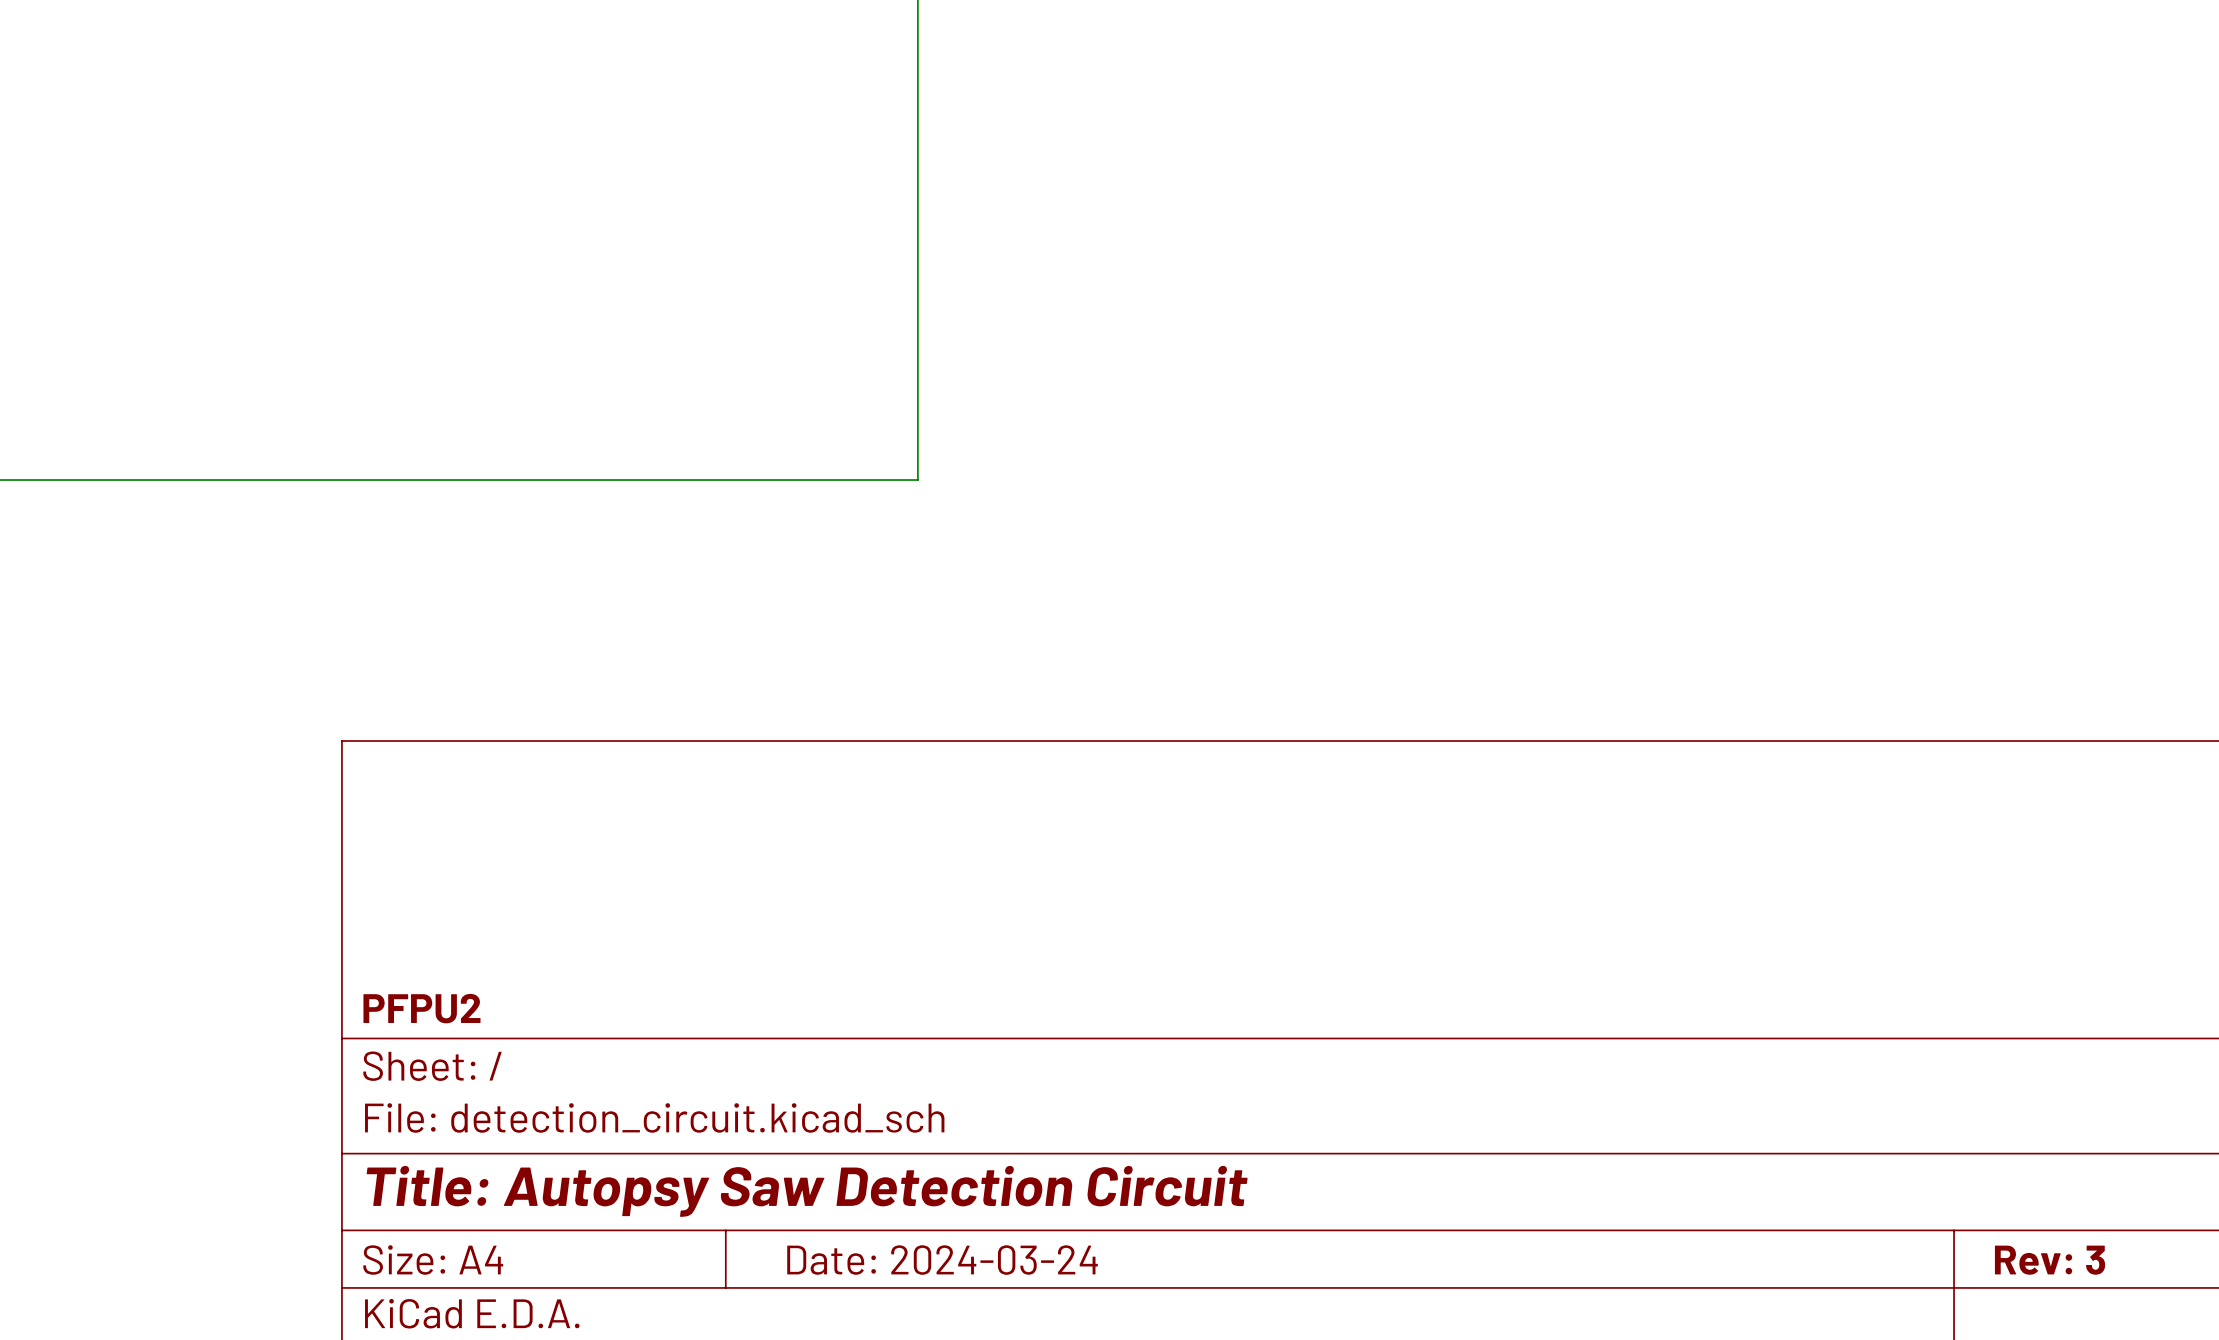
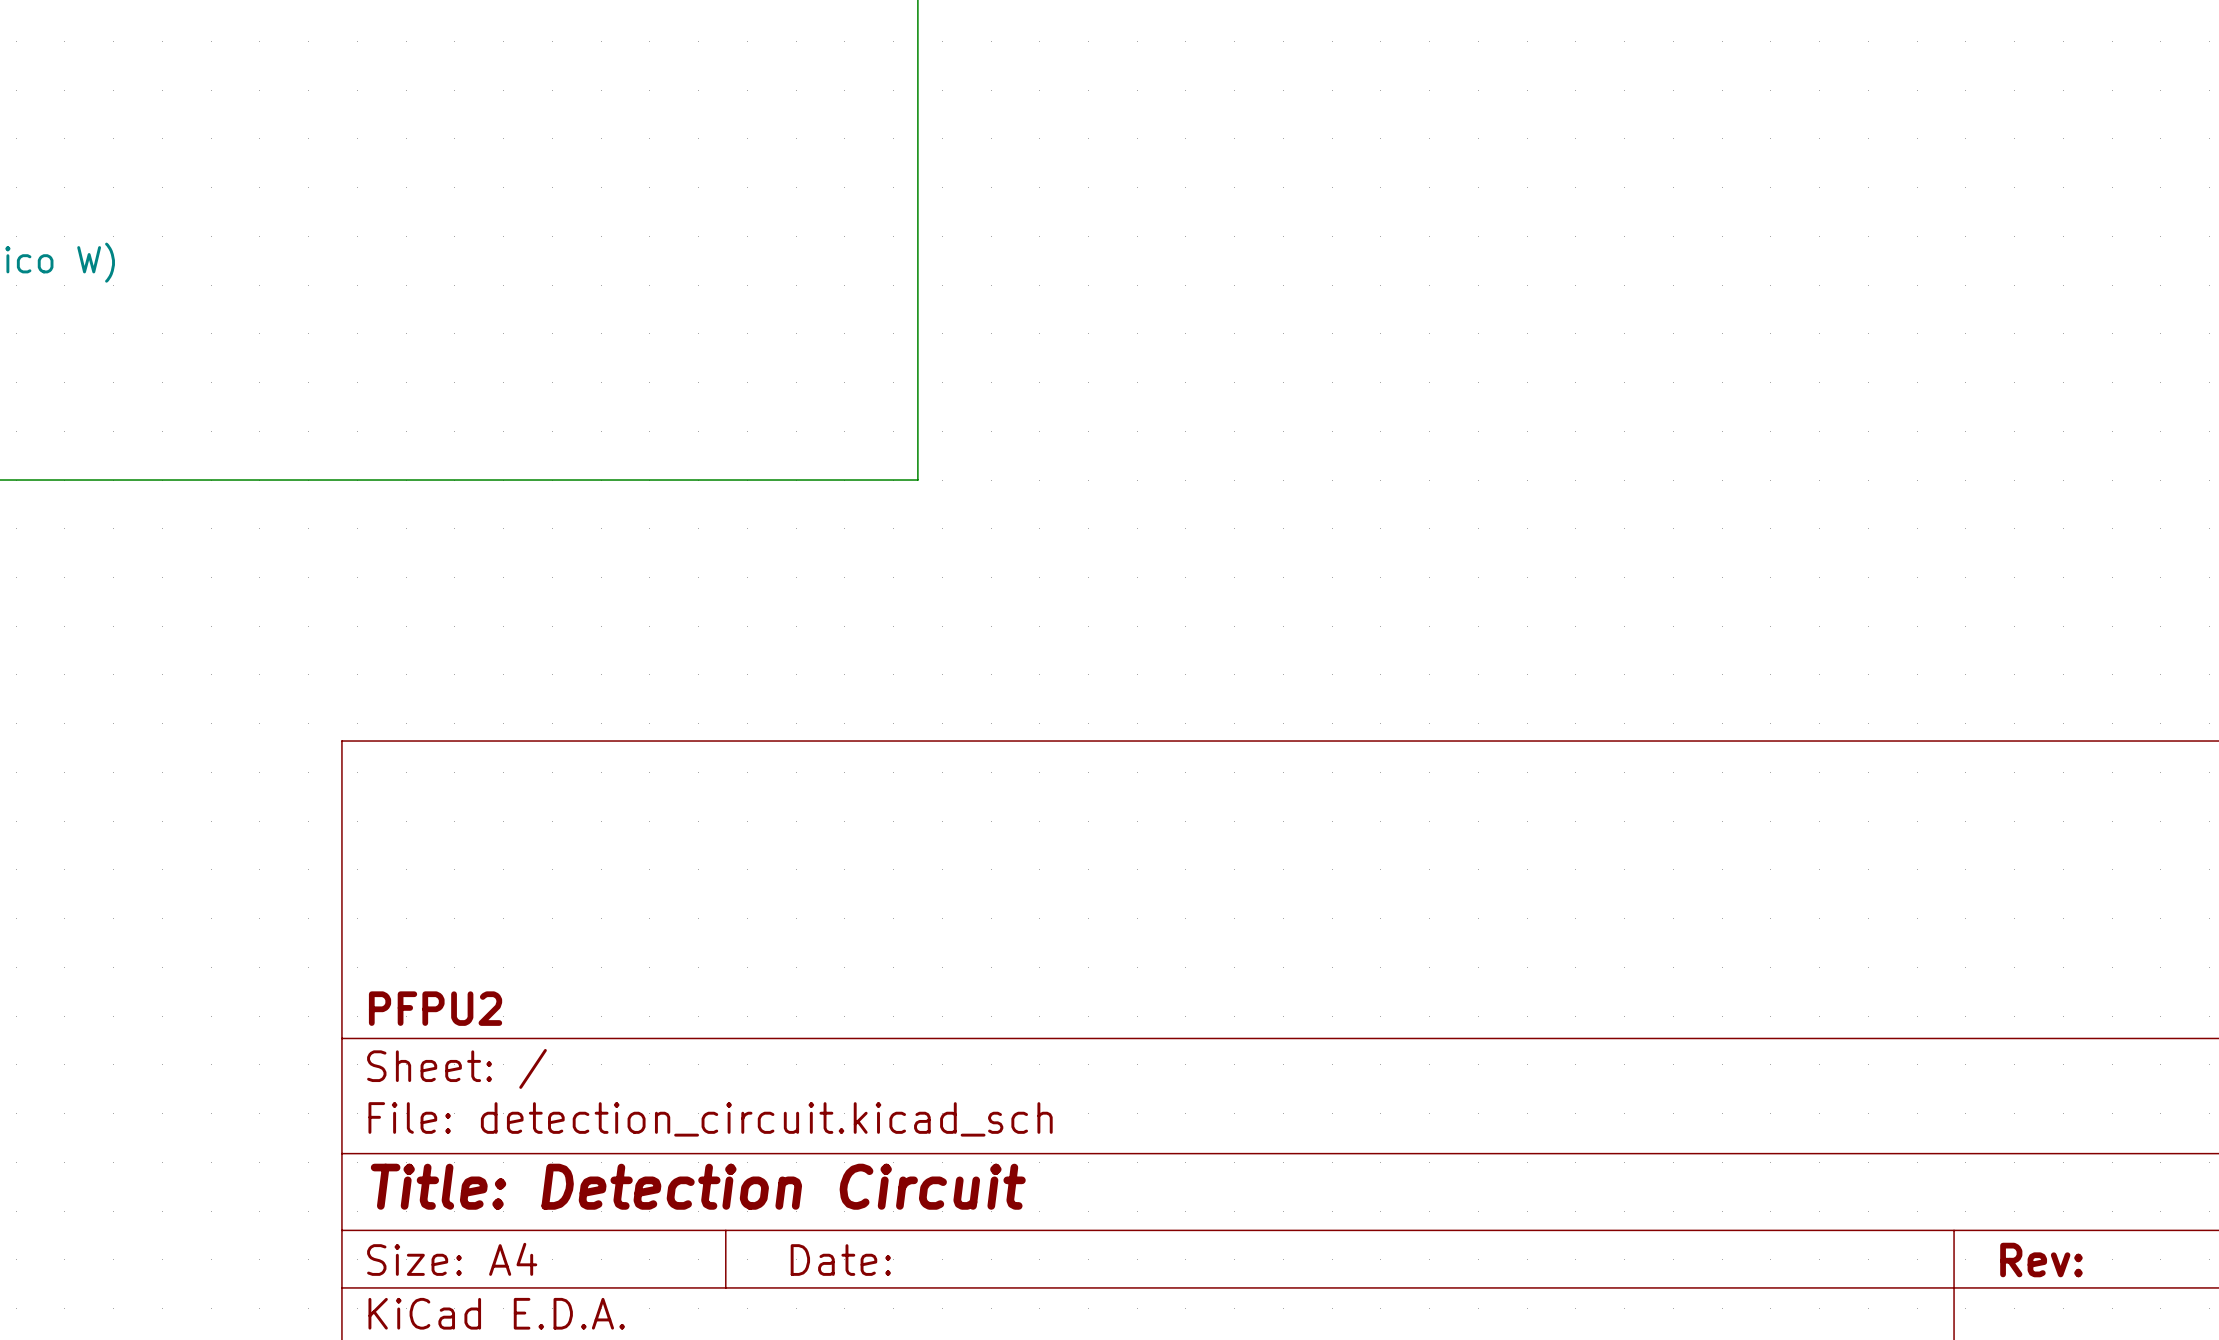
title block: Title: Autopsy Saw Detection Circuit (807, 1191) -> Title: Detection Circuit (698, 1186)
title block: Date: 2024-03-24 (942, 1260) -> Date: (840, 1260)
title block: Rev: 3 (2050, 1260) -> Rev: (2041, 1260)

